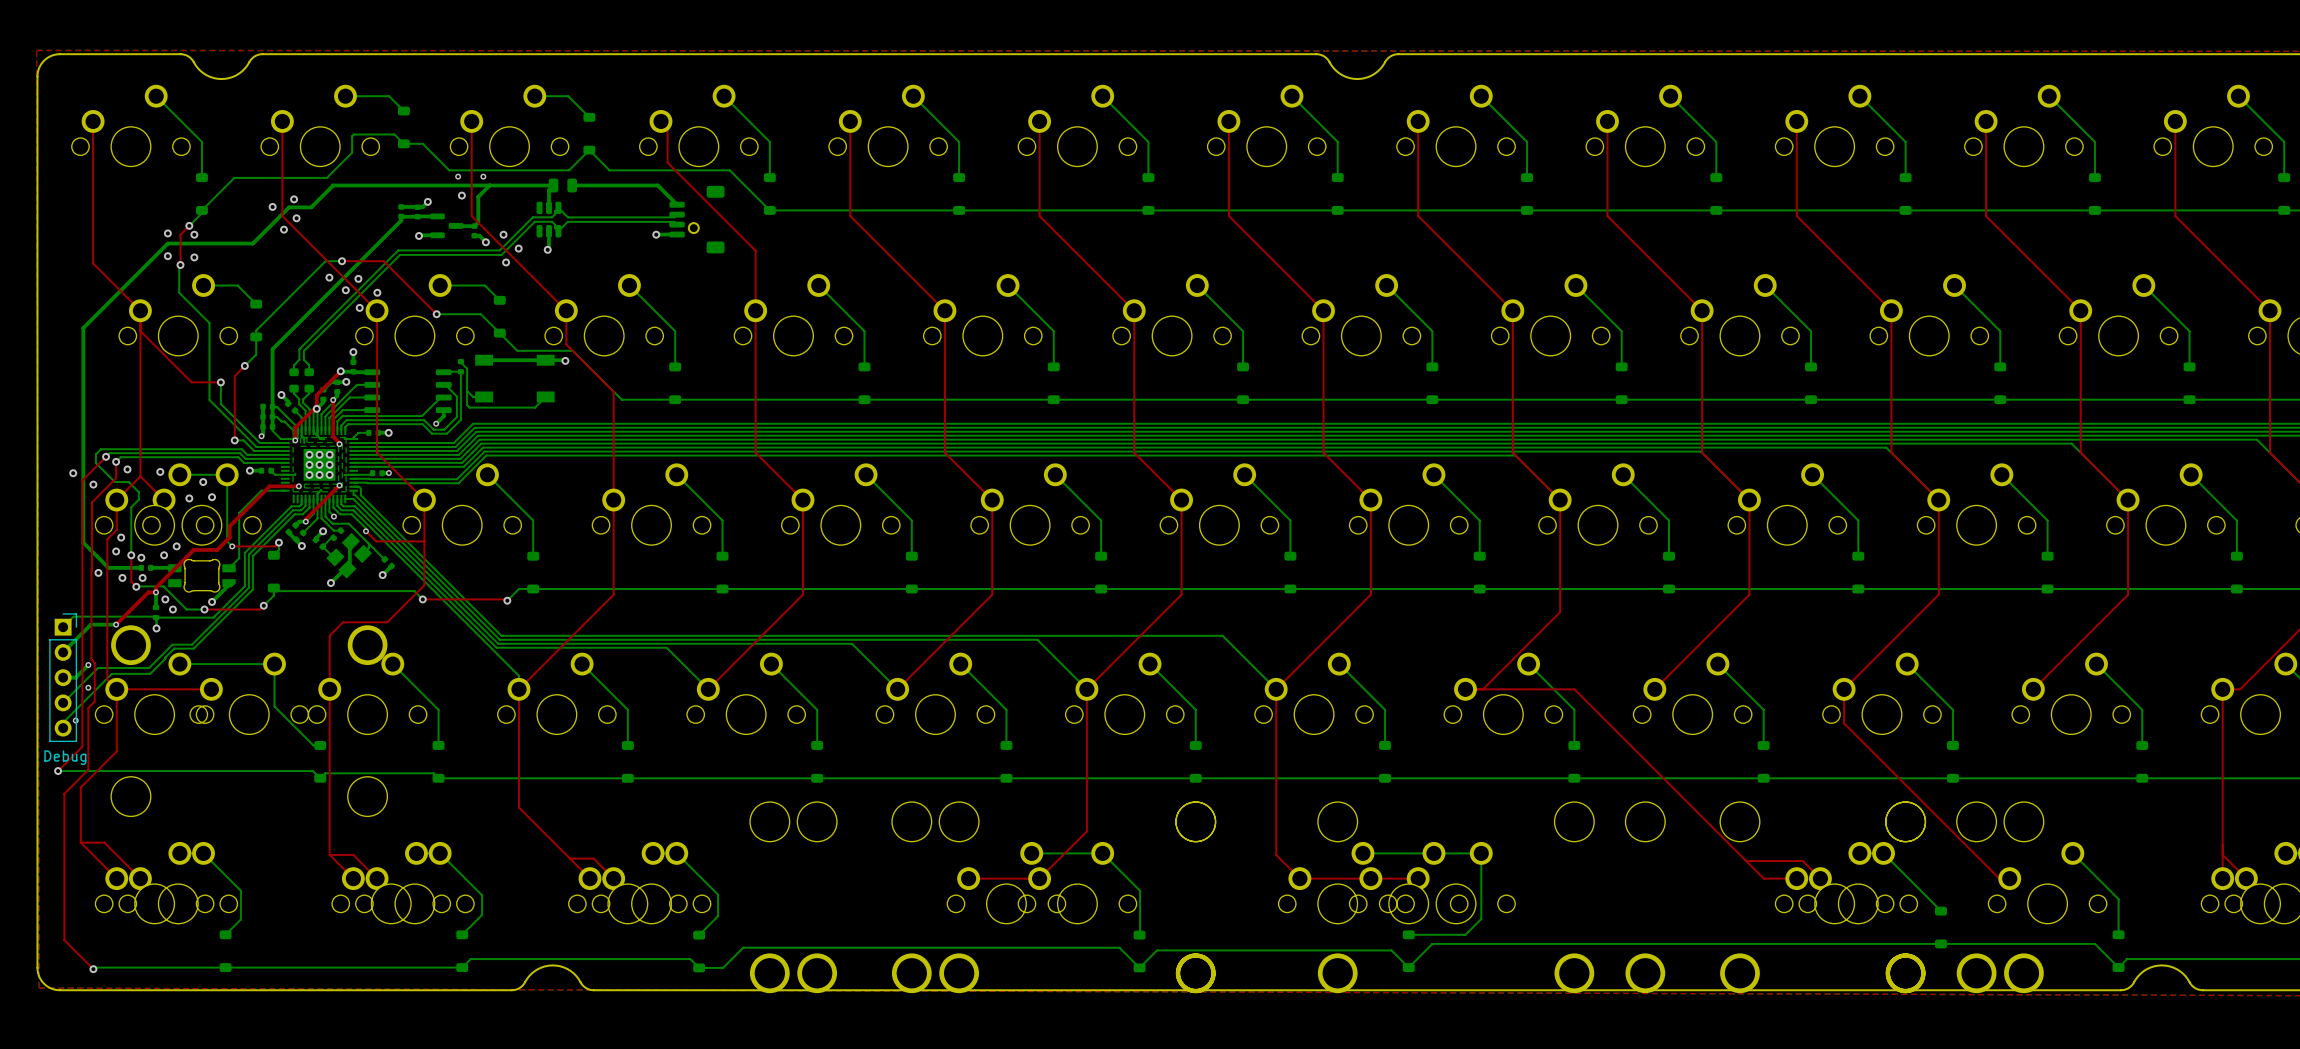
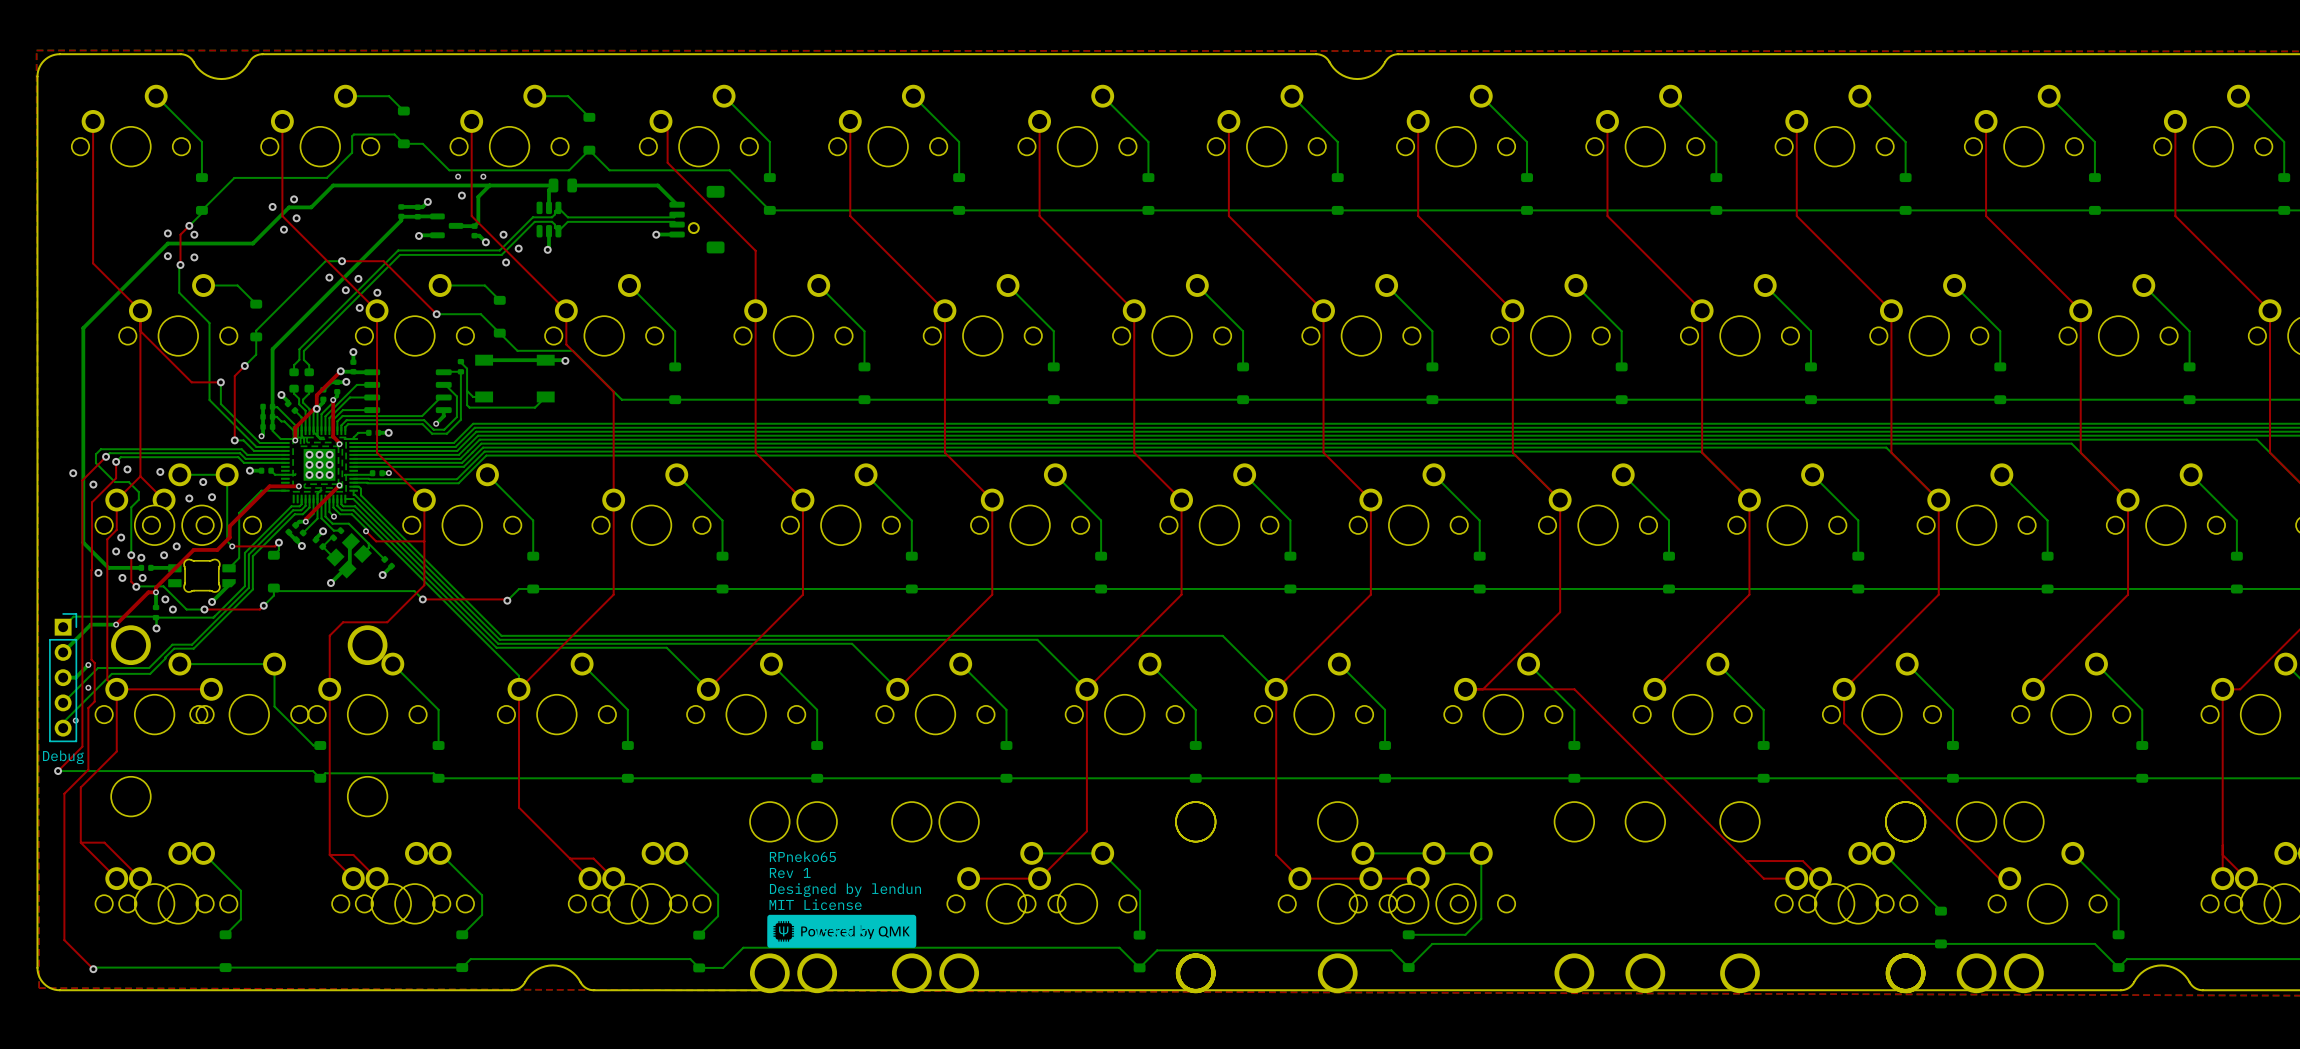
text: none -> RPneko65 (802, 856)
text: none -> Rev 1 (790, 873)
text: none -> Designed by lendun (845, 890)
text: none -> MIT License (815, 904)
part: none -> (841, 931)

